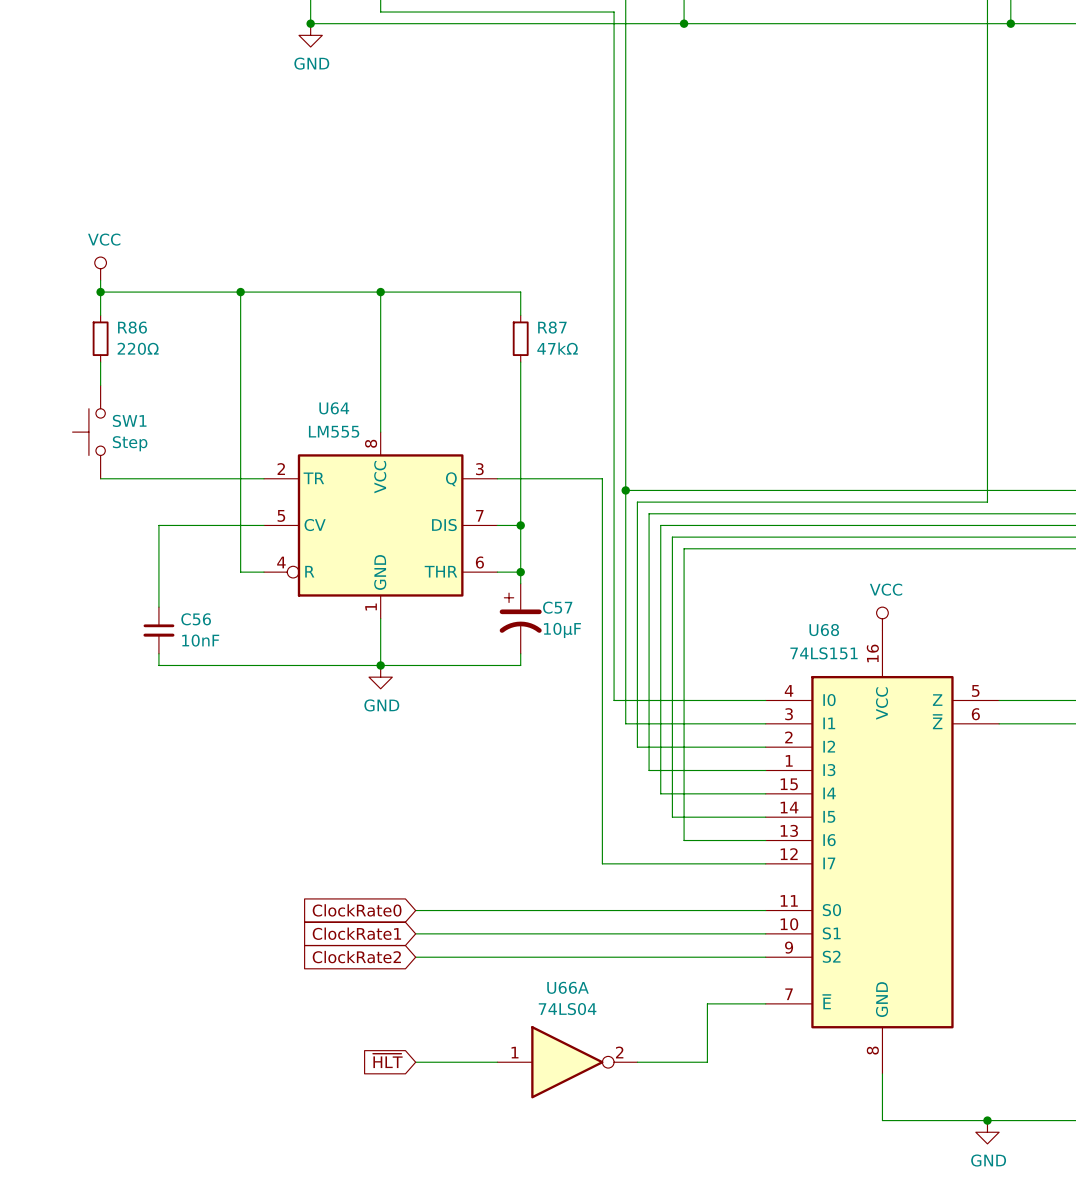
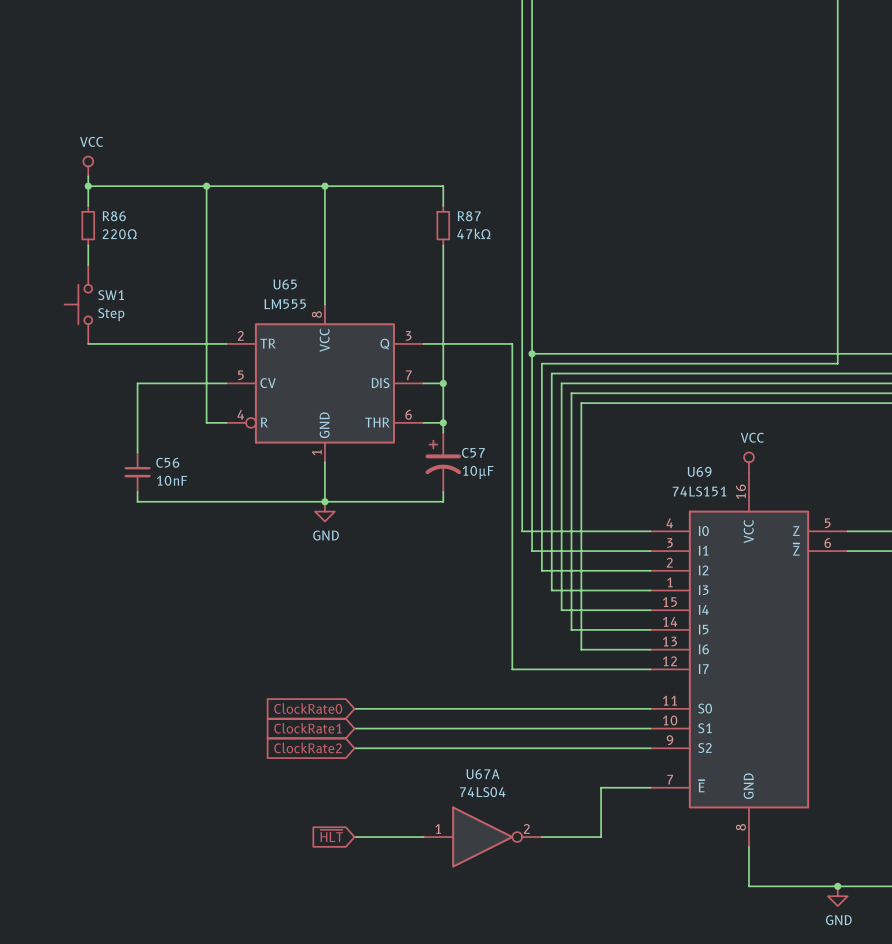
U64 name: U64 (334, 408) -> U65 (285, 284)
U68 name: U68 (824, 630) -> U69 (699, 471)
U66A name: U66A (568, 987) -> U67A (483, 774)

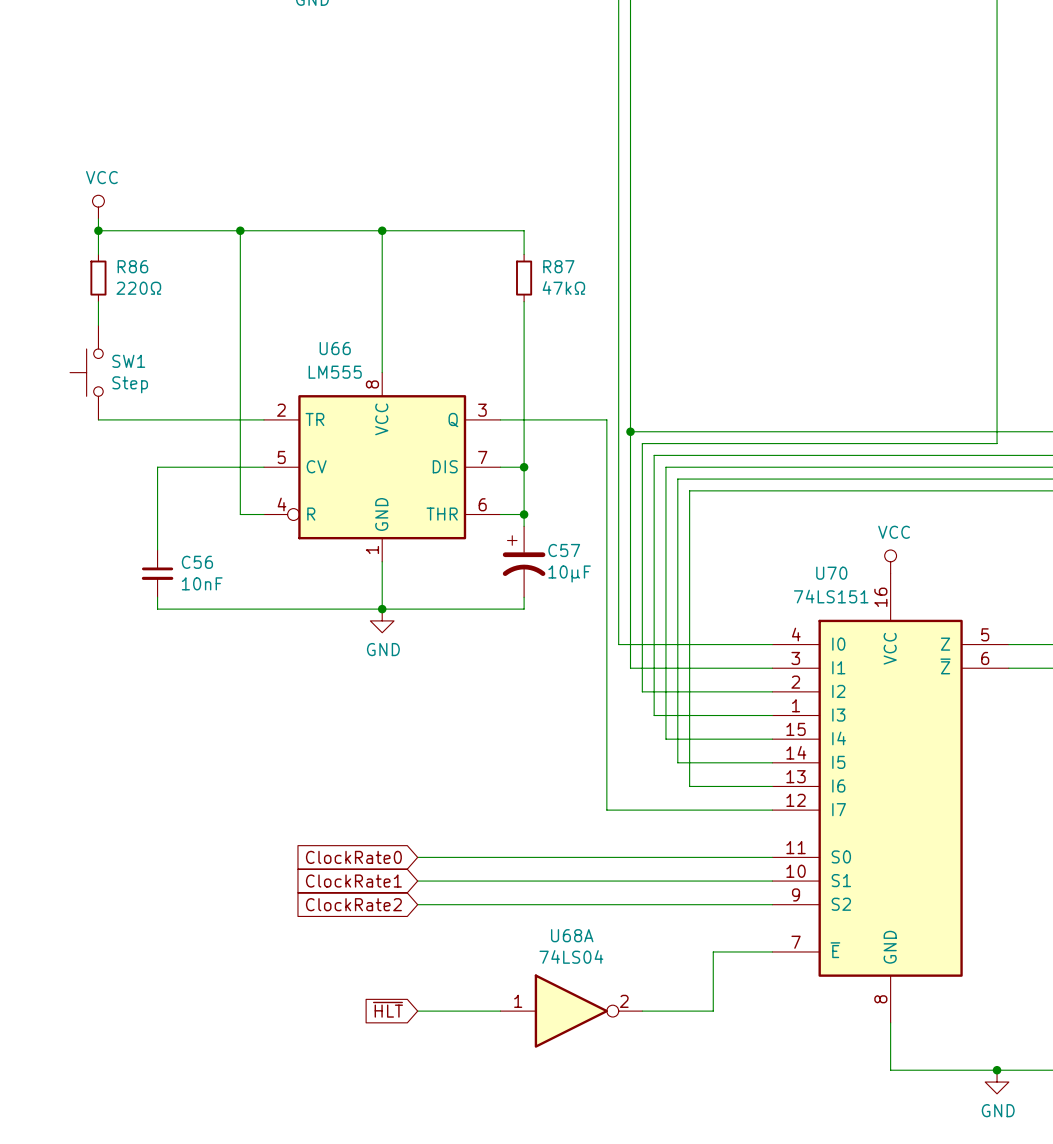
U65 name: U65 (285, 284) -> U66 (335, 348)
U69 name: U69 (699, 471) -> U70 (831, 573)
U67A name: U67A (483, 774) -> U68A (572, 935)

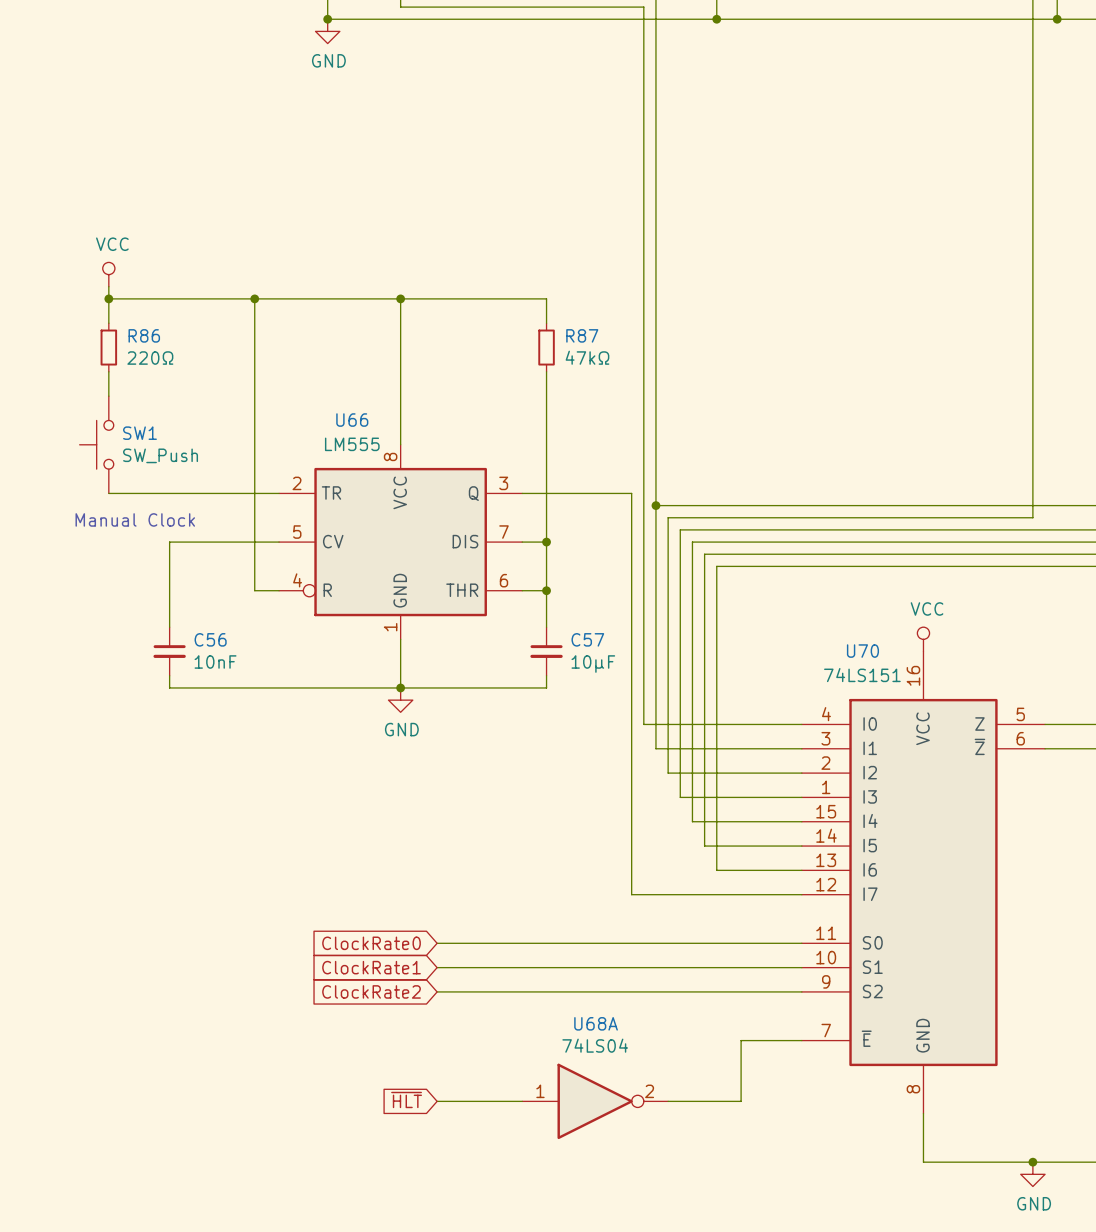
SW1 value: Step (130, 384) -> SW_Push (160, 455)
text: none -> Manual Clock (135, 519)
C57 symbol: [502, 526, 546, 598] -> [530, 627, 563, 676]

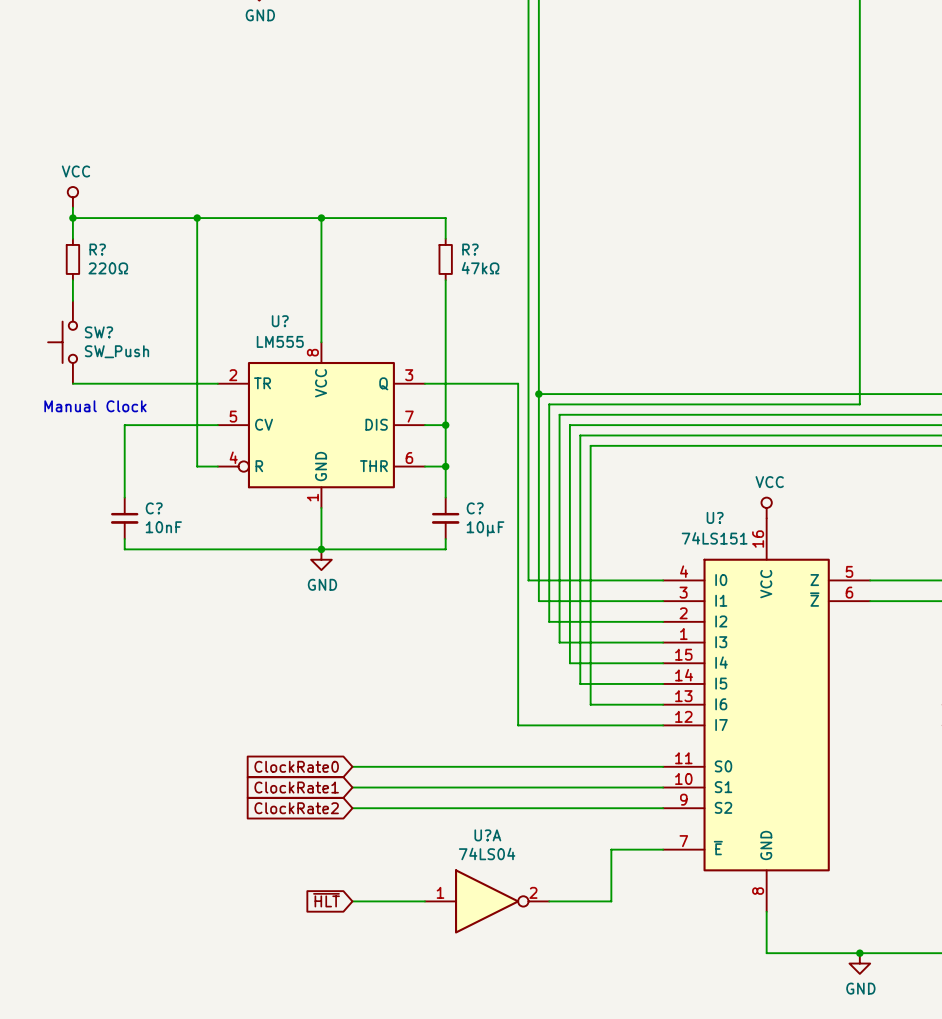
R86 name: R86 (144, 335) -> R? (97, 249)
R87 name: R87 (582, 335) -> R? (470, 249)
U66 name: U66 (352, 420) -> U? (280, 321)
SW1 name: SW1 (139, 433) -> SW? (98, 332)
C56 name: C56 (210, 639) -> C? (154, 508)
C57 name: C57 (587, 639) -> C? (475, 508)
U70 name: U70 (862, 651) -> U? (715, 517)
U68A name: U68A (596, 1023) -> U?A (487, 835)

